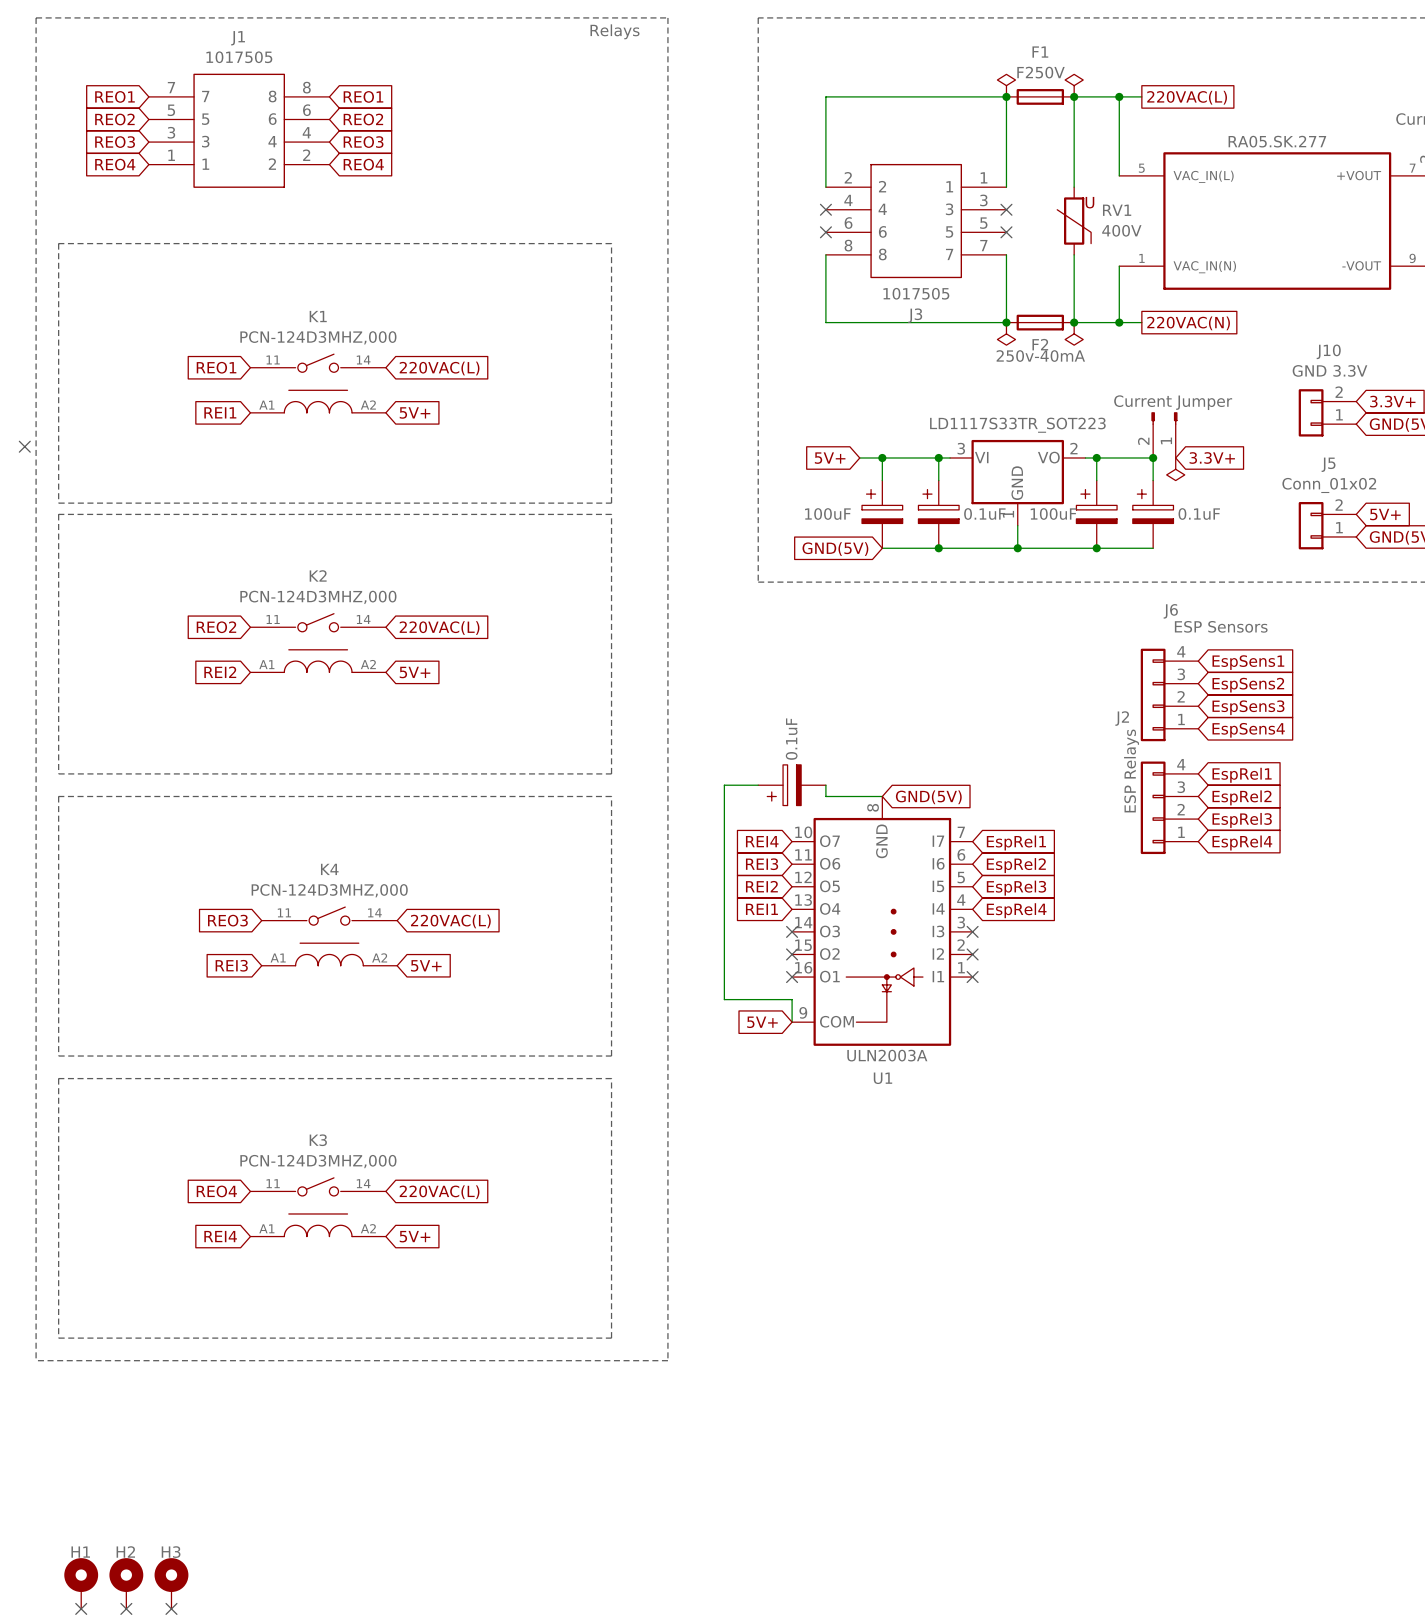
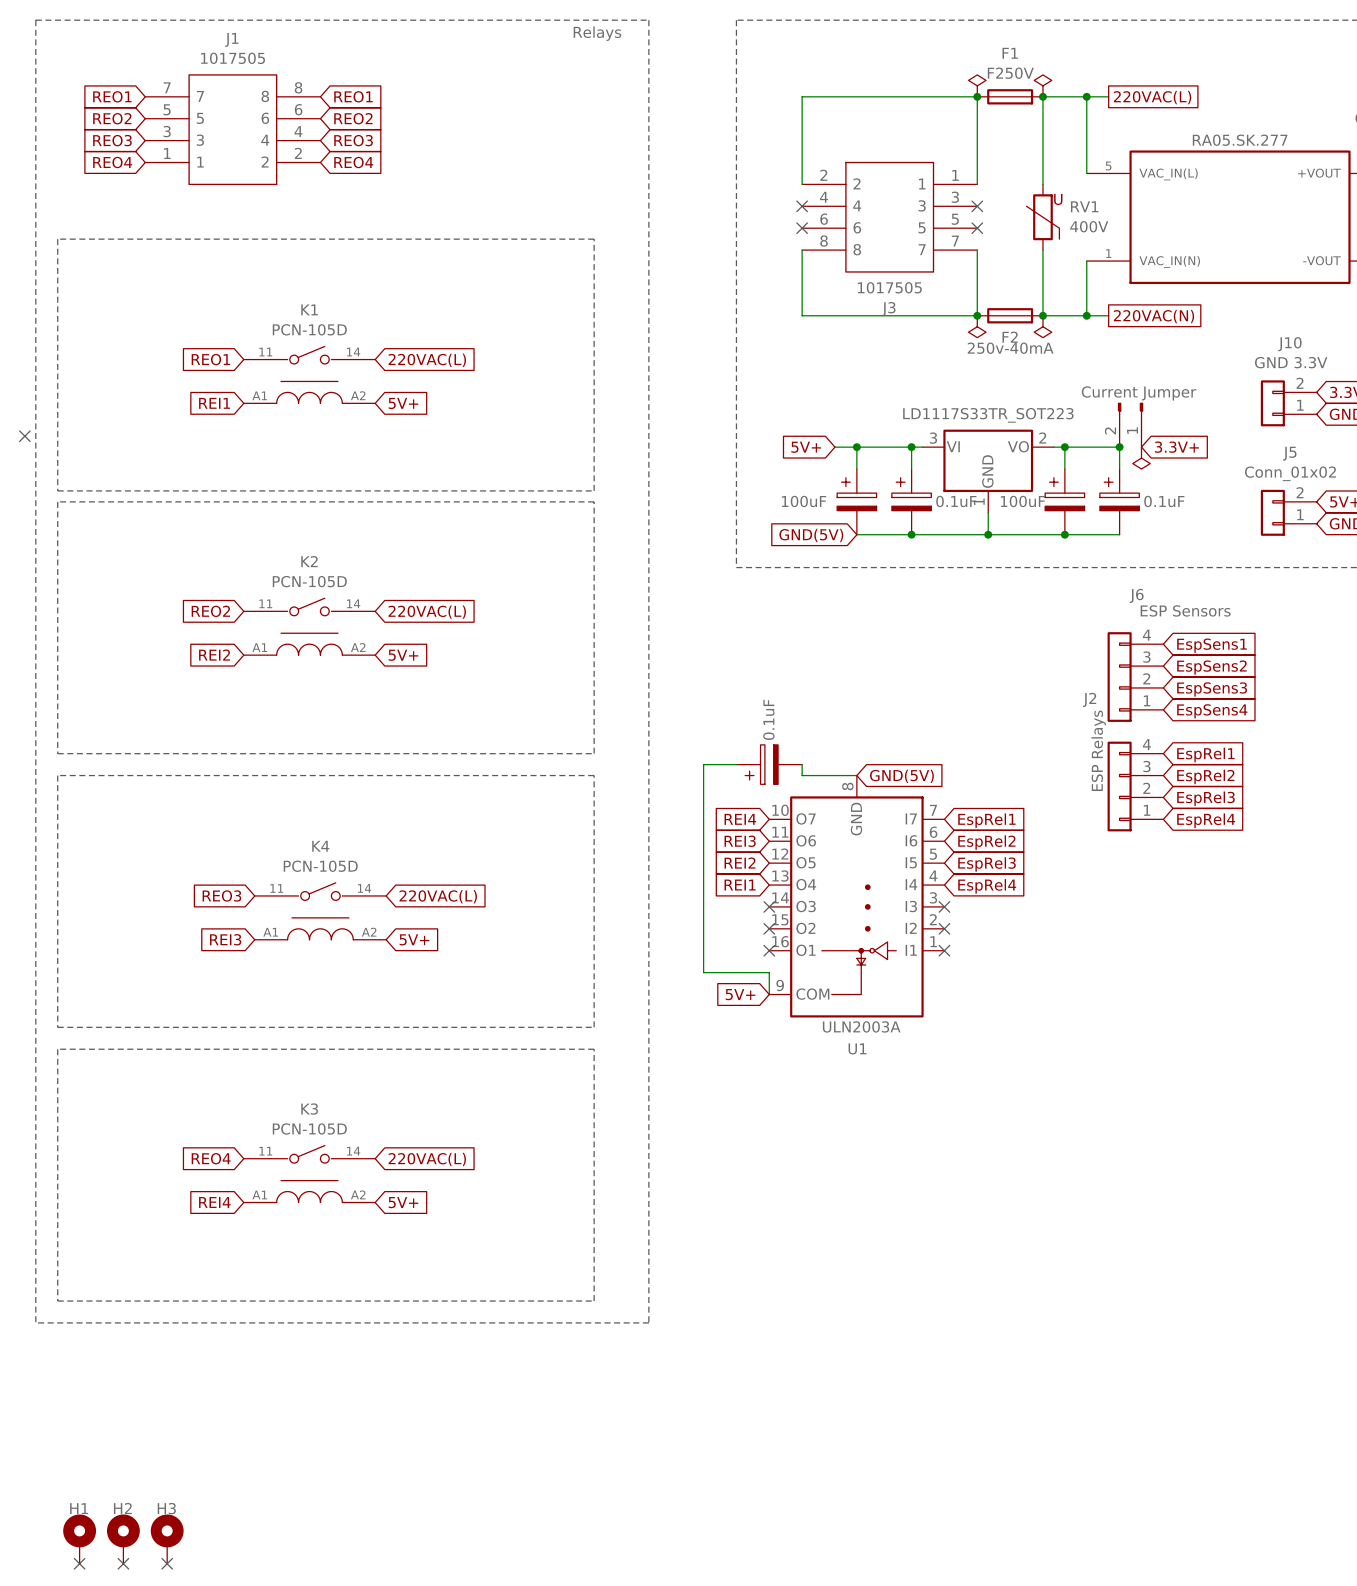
K1 value: PCN-124D3MHZ,000 (318, 337) -> PCN-105D (309, 329)
K2 value: PCN-124D3MHZ,000 (318, 597) -> PCN-105D (309, 581)
K4 value: PCN-124D3MHZ,000 (329, 890) -> PCN-105D (320, 866)
K3 value: PCN-124D3MHZ,000 (318, 1161) -> PCN-105D (309, 1128)

